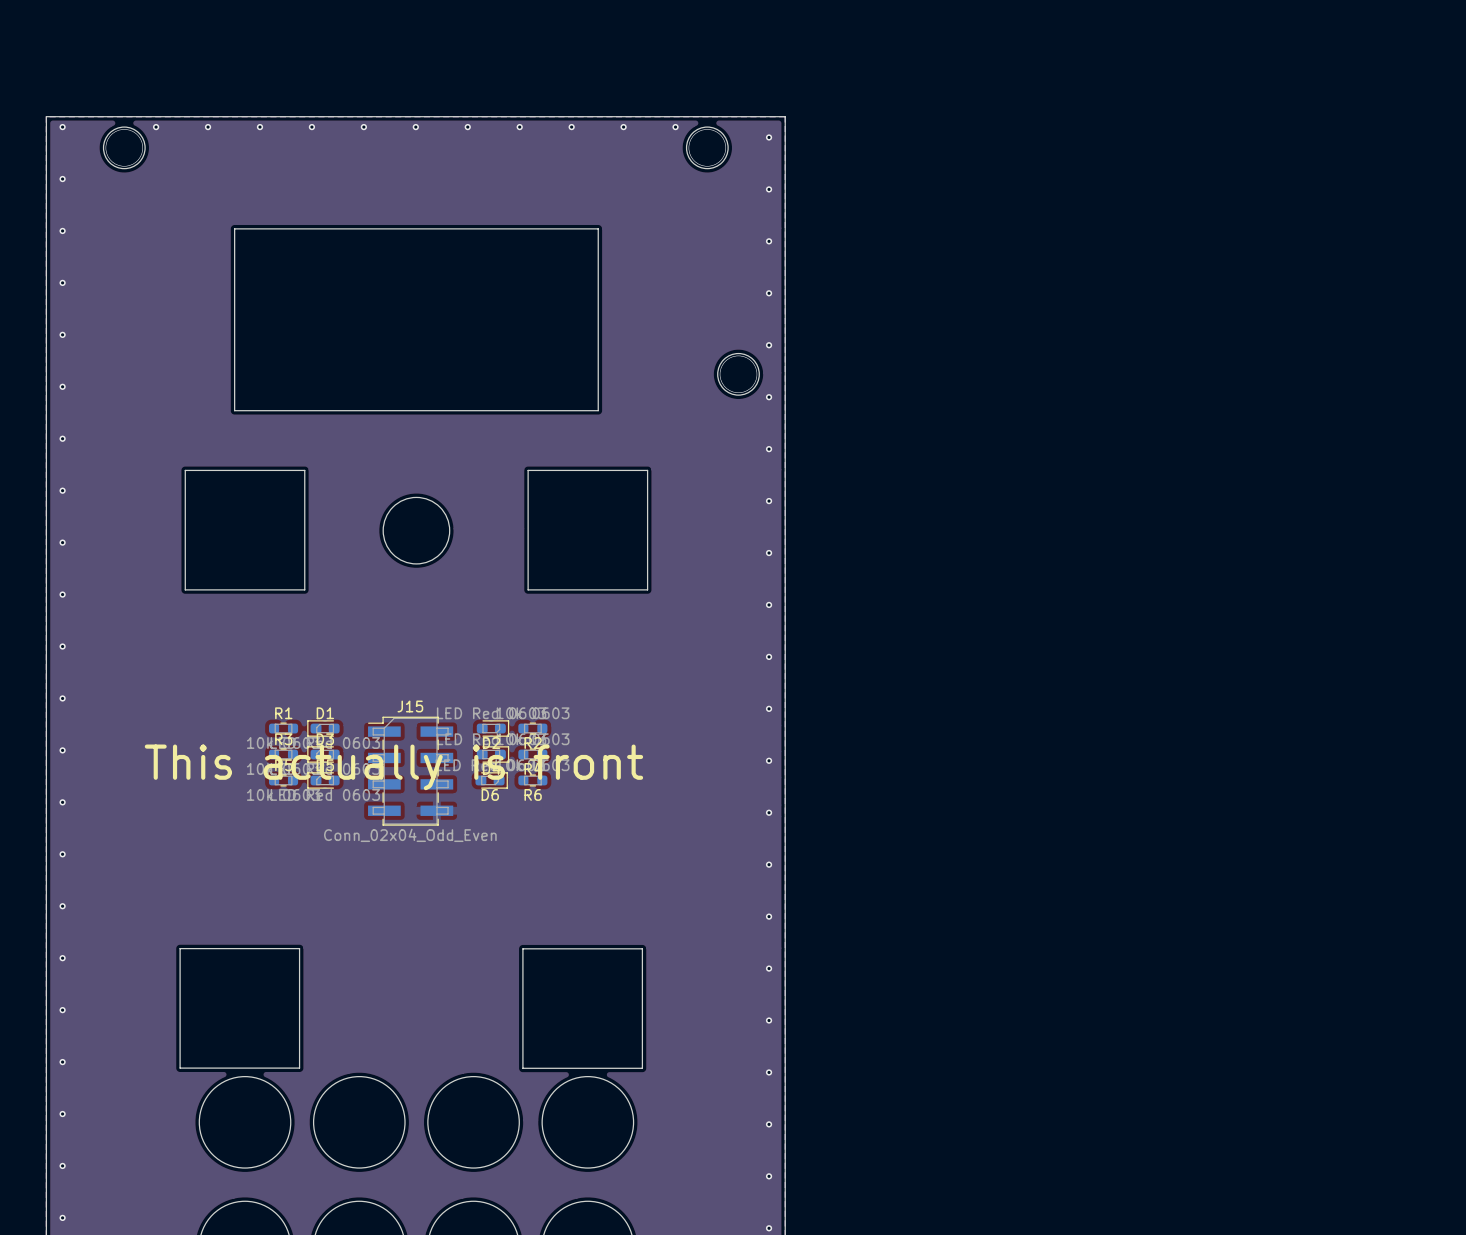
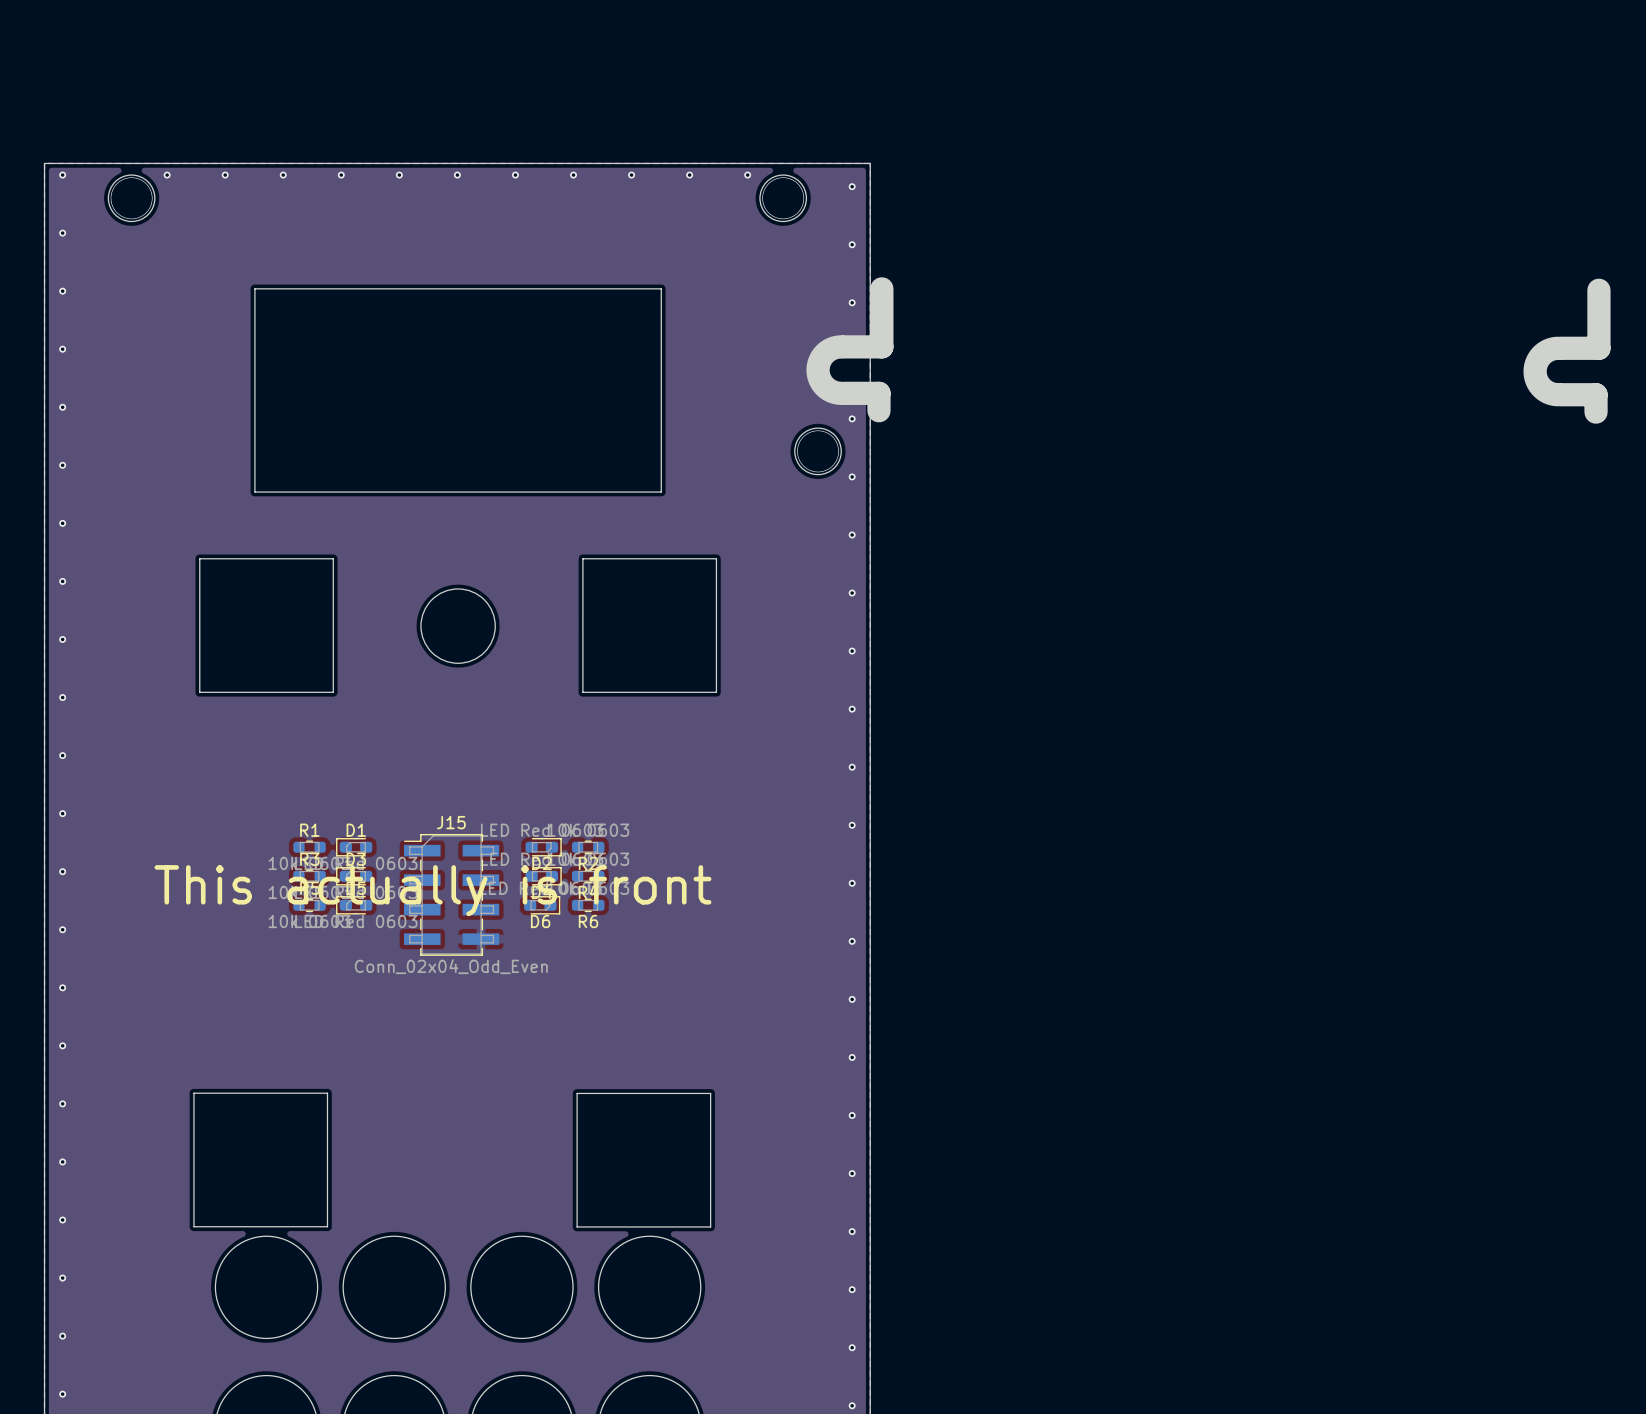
board edge: none -> (881, 288) (881, 346) (844, 346)
board edge: none -> (1598, 290) (1598, 348) (1561, 348)
board edge: none -> (841, 346) (832, 348) (824, 353) (819, 361) (818, 370) (819, 379) (824, 386) (832, 391) (841, 393)
board edge: none -> (1558, 348) (1550, 349) (1542, 354) (1536, 363) (1535, 371) (1536, 379) (1542, 388) (1550, 393) (1558, 394)
via: (769, 293) -> none
board edge: none -> (844, 393) (878, 393) (878, 410)
board edge: none -> (1561, 394) (1596, 394) (1596, 412)

